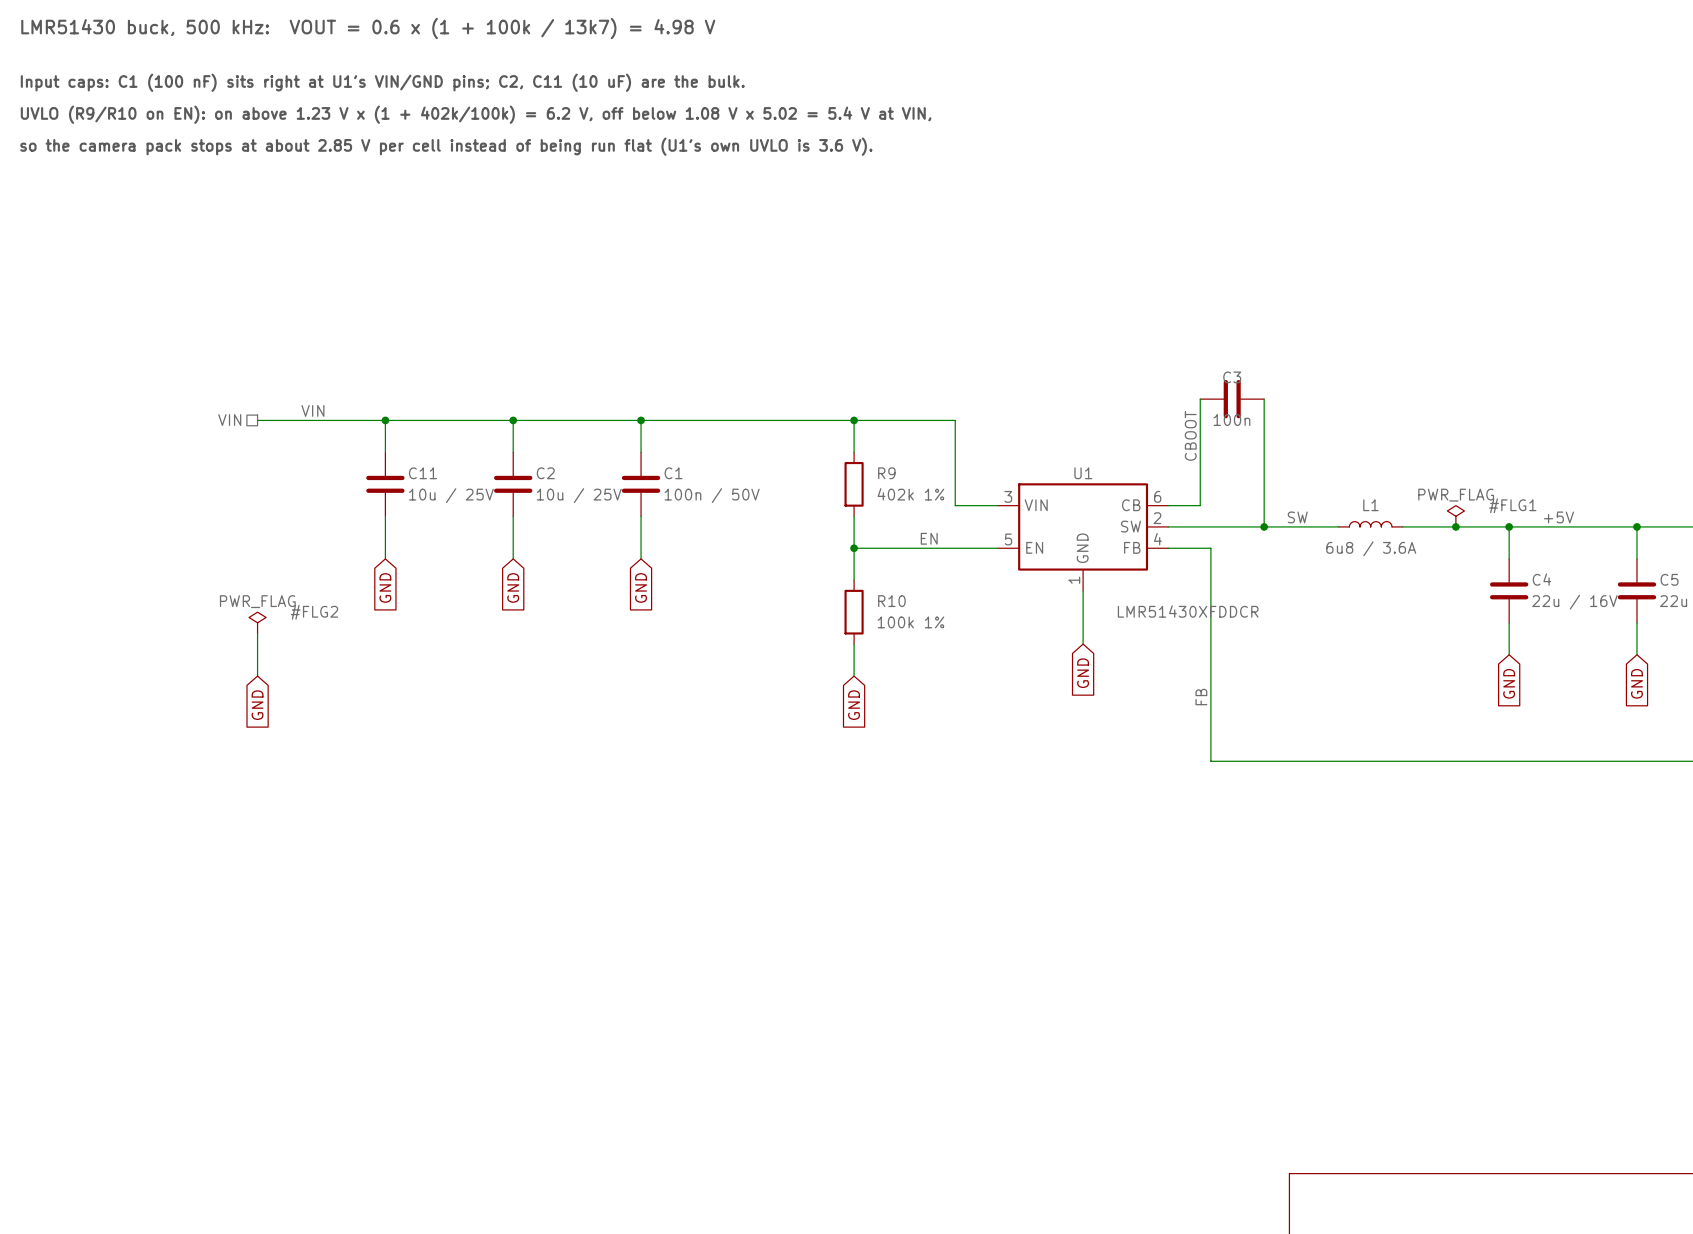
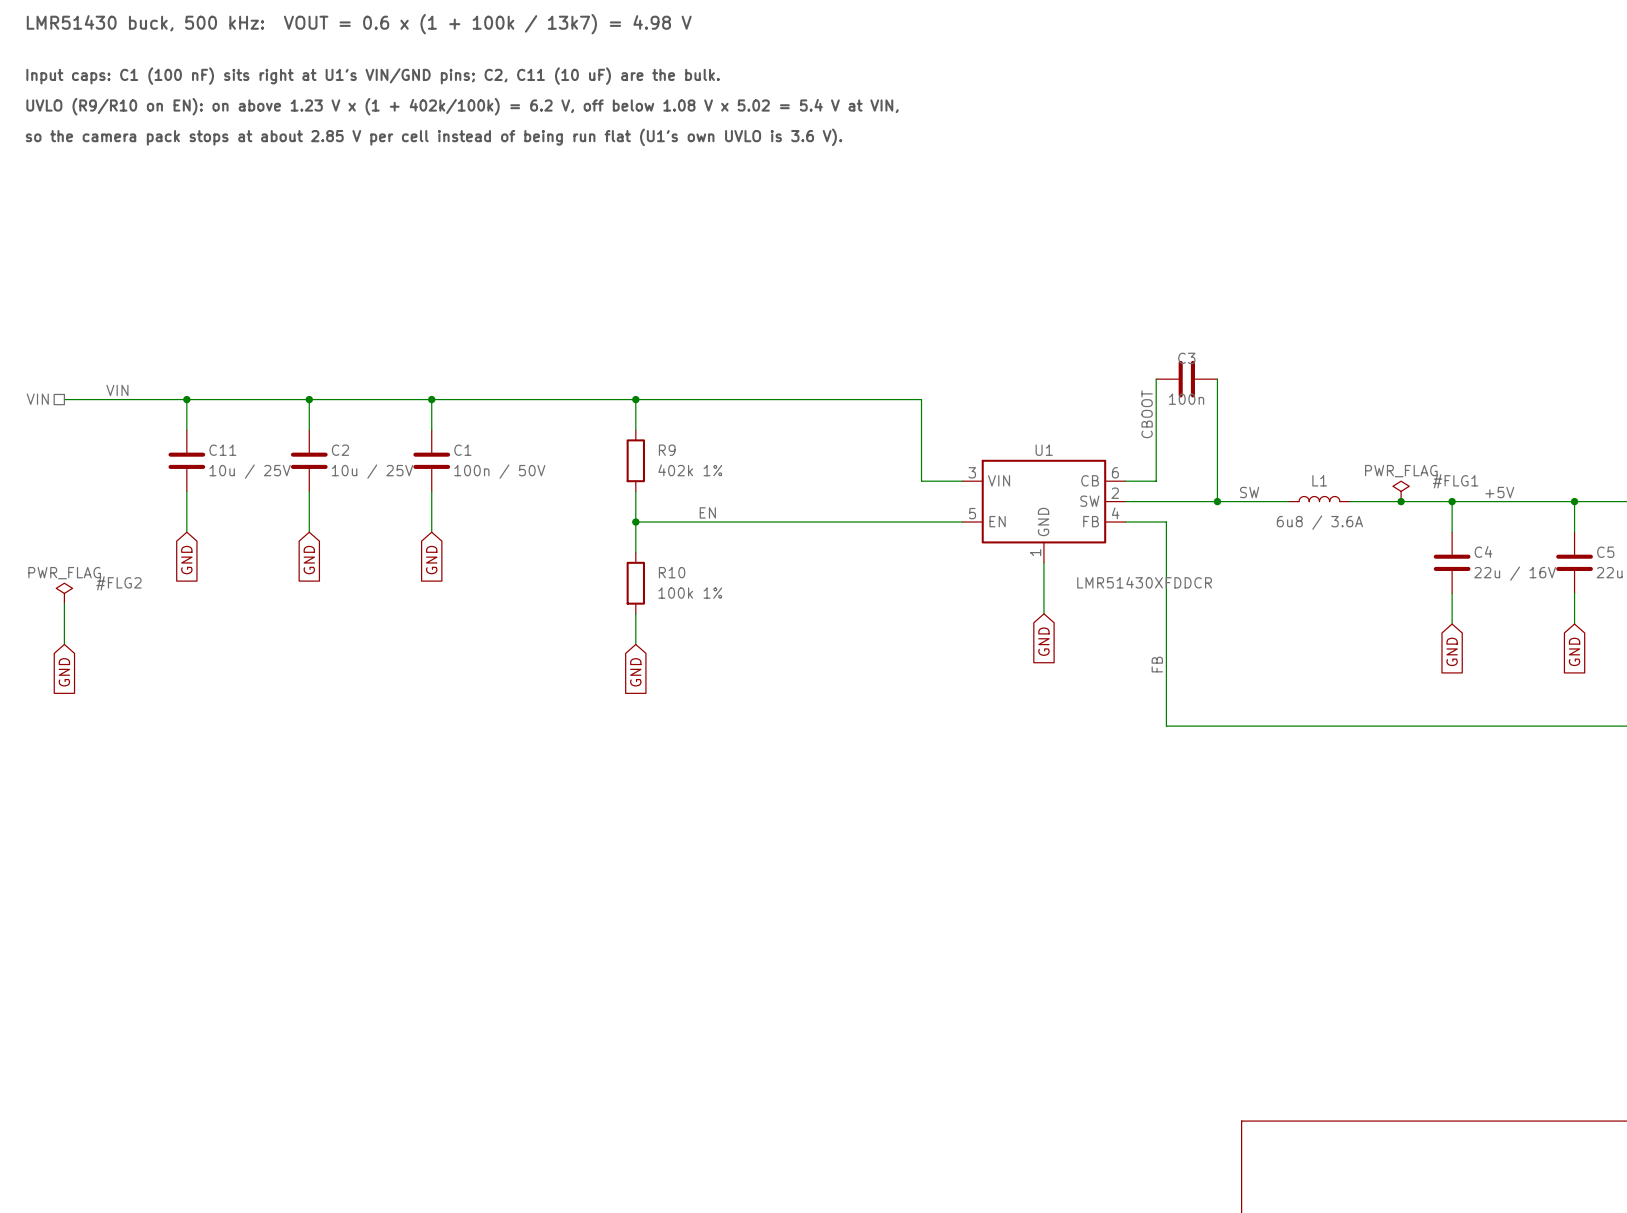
label position: VIN (312, 410) -> VIN (117, 390)
wire: none -> (64, 399) (253, 399)
junction: none -> (186, 399)
hierarchical label position: VIN (229, 420) -> VIN (37, 399)
junction: none -> (309, 399)
wire: (385, 420) (385, 452) -> (186, 399) (186, 430)
junction: (385, 420) -> none
junction: none -> (431, 399)
wire: (513, 420) (513, 452) -> (309, 399) (309, 430)
junction: (513, 420) -> none
wire: (641, 420) (641, 452) -> (431, 399) (431, 430)
junction position: (641, 420) -> (635, 399)
wire: (854, 420) (854, 452) -> (635, 399) (635, 430)
junction: (854, 420) -> none
C11 position: (385, 484) -> (186, 460)
C2 position: (513, 484) -> (309, 460)
C1 position: (641, 484) -> (431, 460)
R9 position: (854, 484) -> (635, 460)
wire: (385, 516) (385, 558) -> (186, 491) (186, 532)
wire: (513, 516) (513, 558) -> (309, 491) (309, 532)
wire: (641, 516) (641, 558) -> (431, 491) (431, 532)
wire: (854, 516) (854, 580) -> (635, 491) (635, 552)
label position: EN (929, 538) -> EN (707, 512)
wire: none -> (635, 522) (824, 522)
junction: none -> (635, 522)
junction: (854, 548) -> none
global label: none -> GND (186, 560)
global label: none -> GND (309, 560)
global label: GND (385, 587) -> none
global label: none -> GND (431, 560)
global label: GND (513, 587) -> none
global label: GND (641, 587) -> none
R10 position: (854, 612) -> (635, 583)
#FLG2 position: PWR_FLAG (257, 622) -> PWR_FLAG (64, 593)
wire: (257, 633) (257, 676) -> (64, 603) (64, 644)
wire: (854, 644) (854, 676) -> (635, 613) (635, 644)
global label: none -> GND (64, 672)
global label: GND (257, 705) -> none
global label: none -> GND (635, 672)
global label: GND (854, 705) -> none

